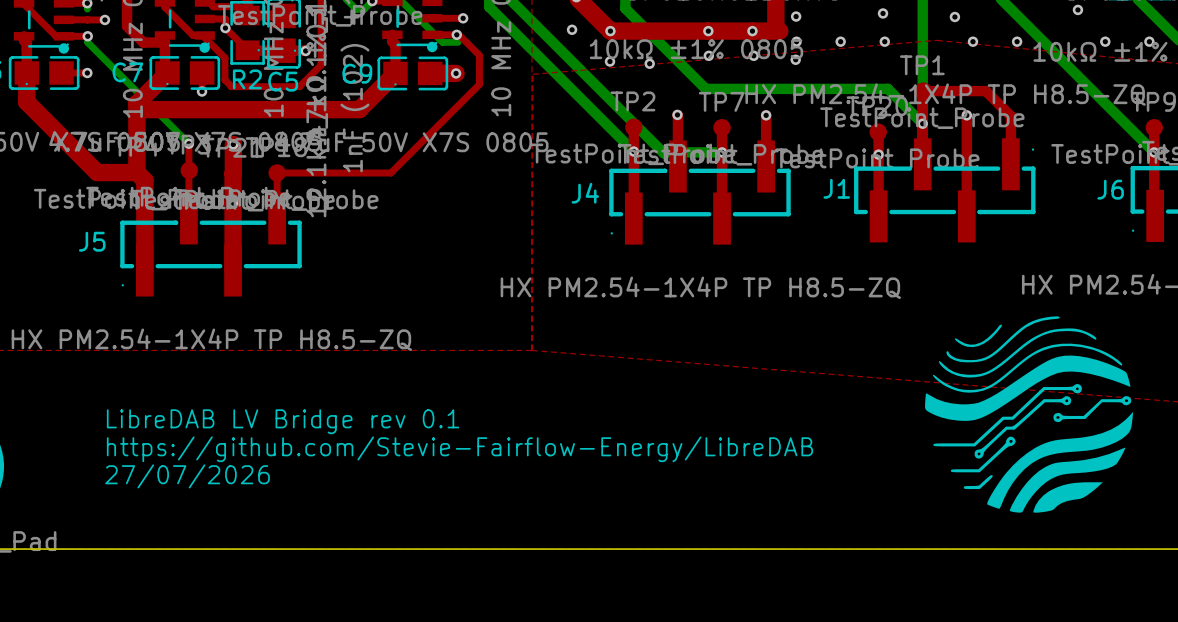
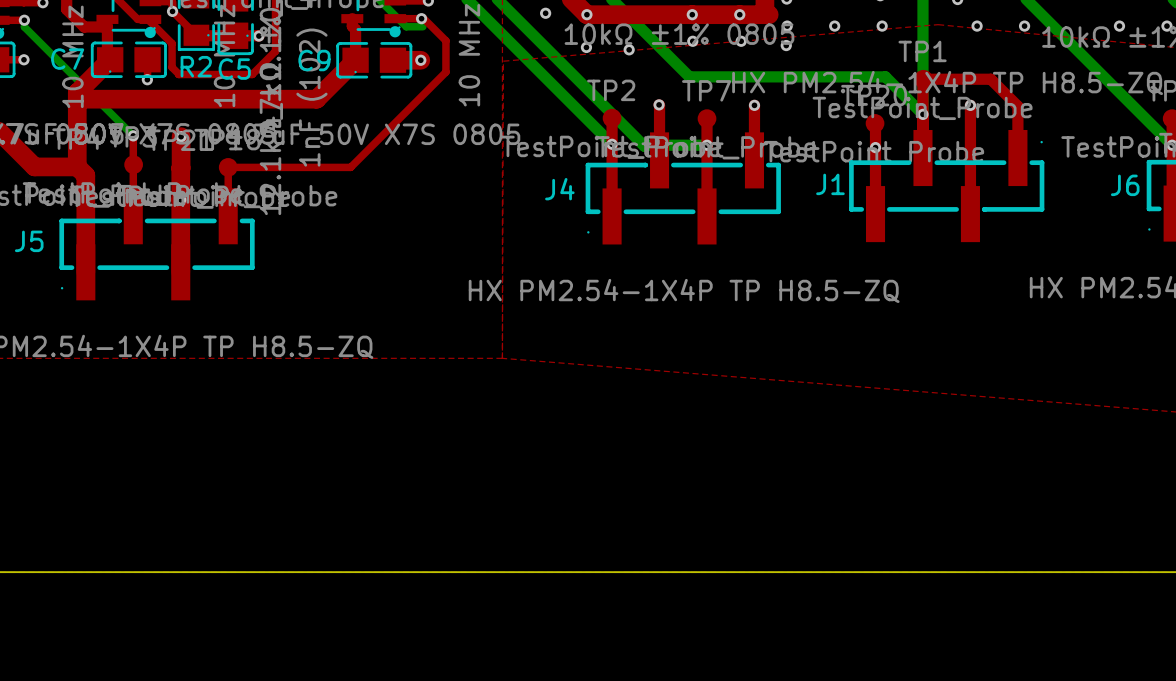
drawing: [925, 316, 1134, 513] -> none
text: LibreDAB LV Bridge rev 0.1 (283, 421) -> none
text: https://github.com/Stevie-Fairflow-Energy/LibreDAB (459, 449) -> none
text: 27/07/2026 (187, 476) -> none

